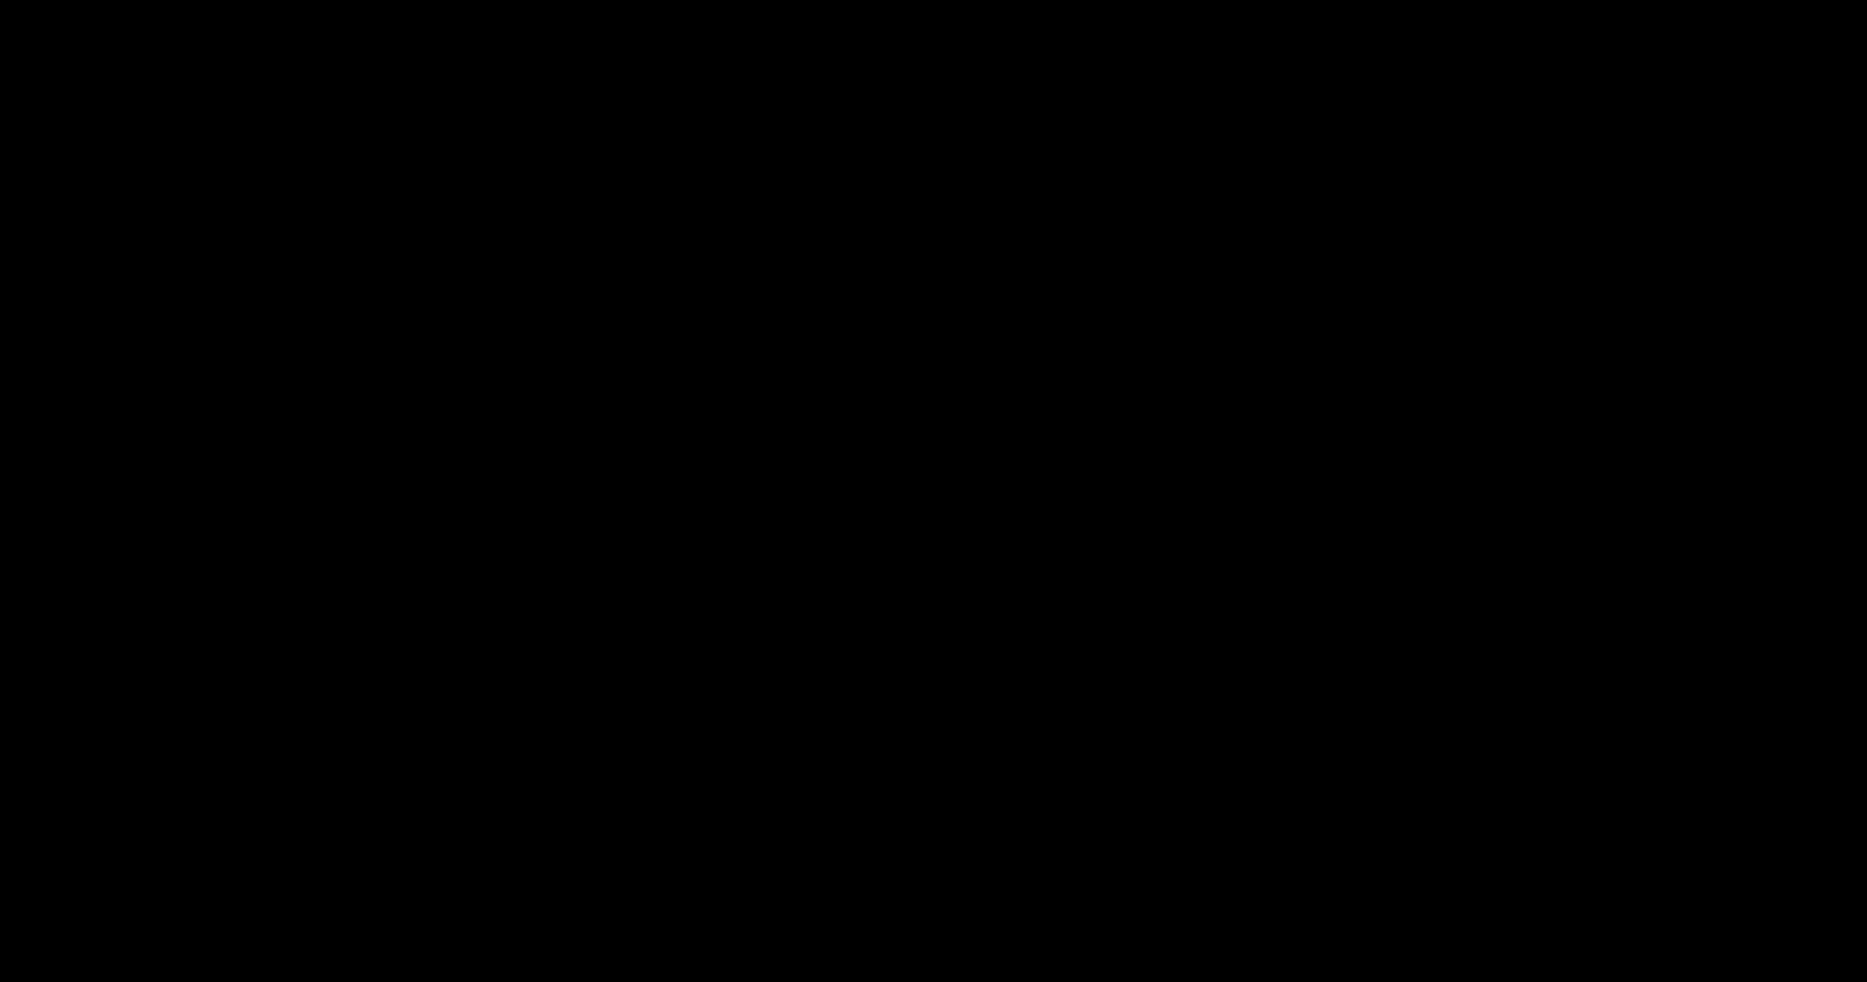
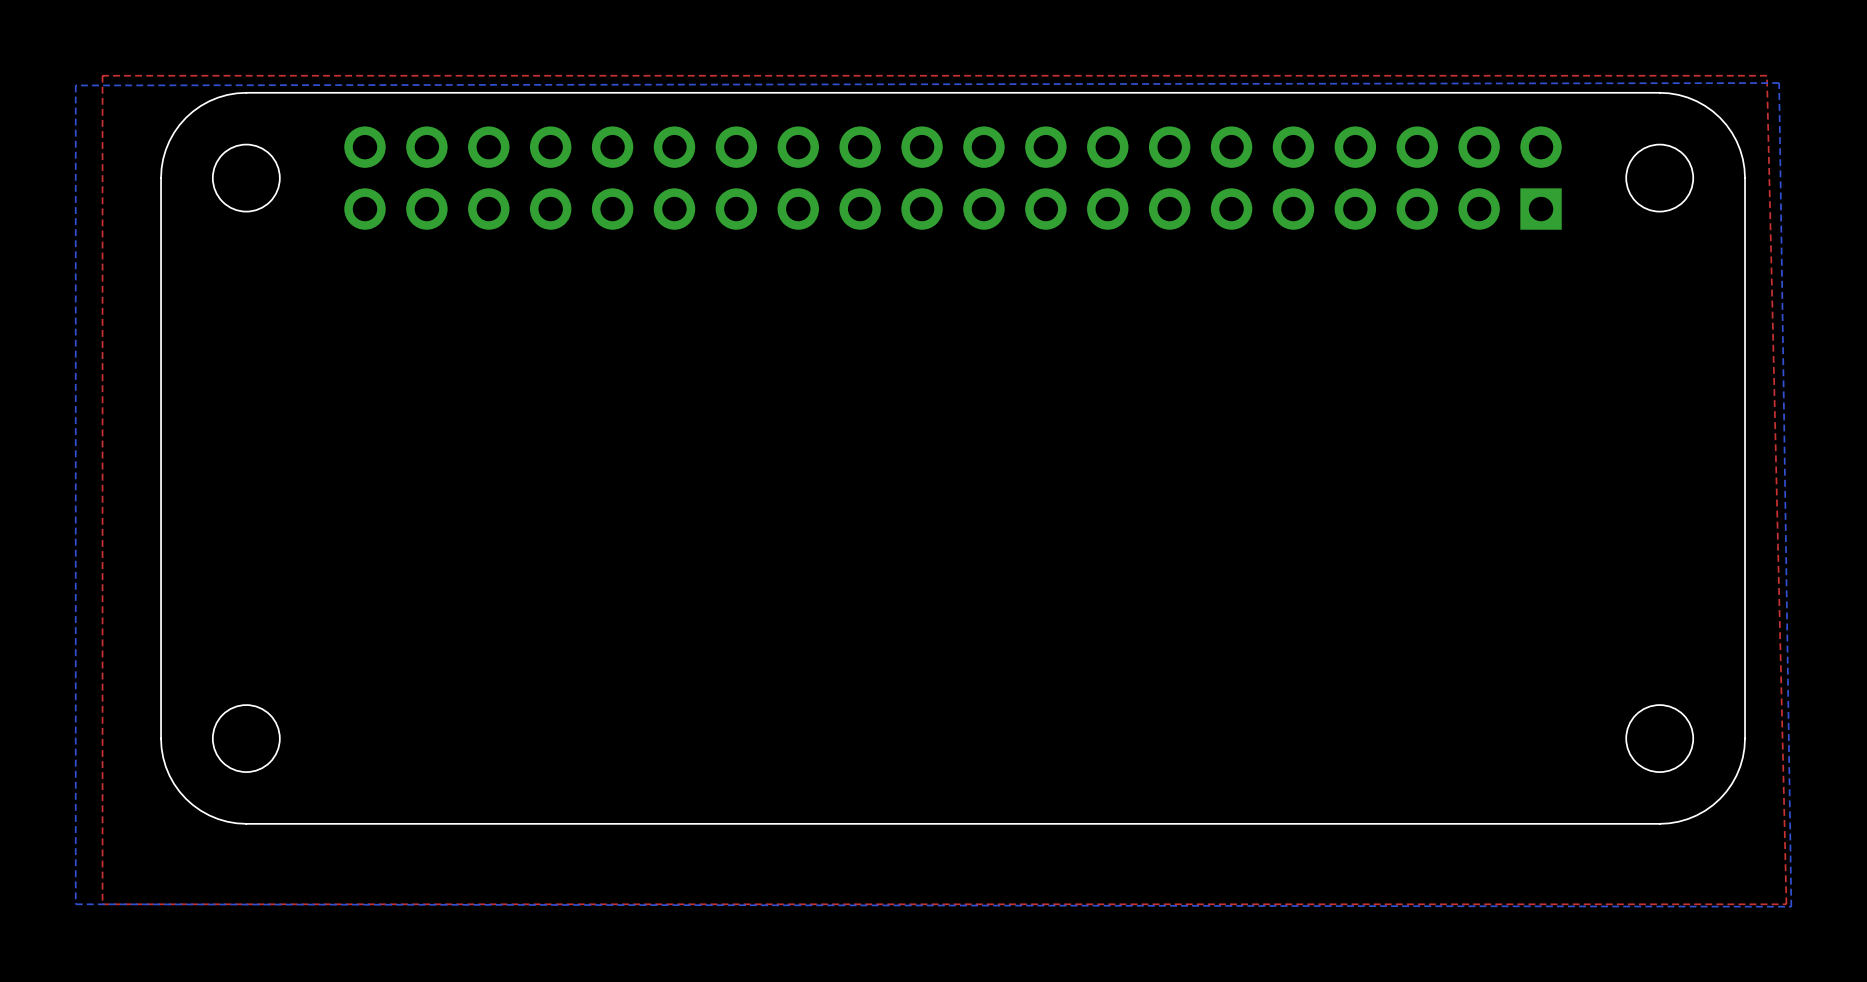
top zone outline: none -> (1766, 75) (102, 75) (102, 904) (1786, 904) (1766, 75)
bottom zone outline: none -> (1779, 83) (75, 85) (75, 904) (1791, 906) (1779, 83)
part: none -> (953, 458)

